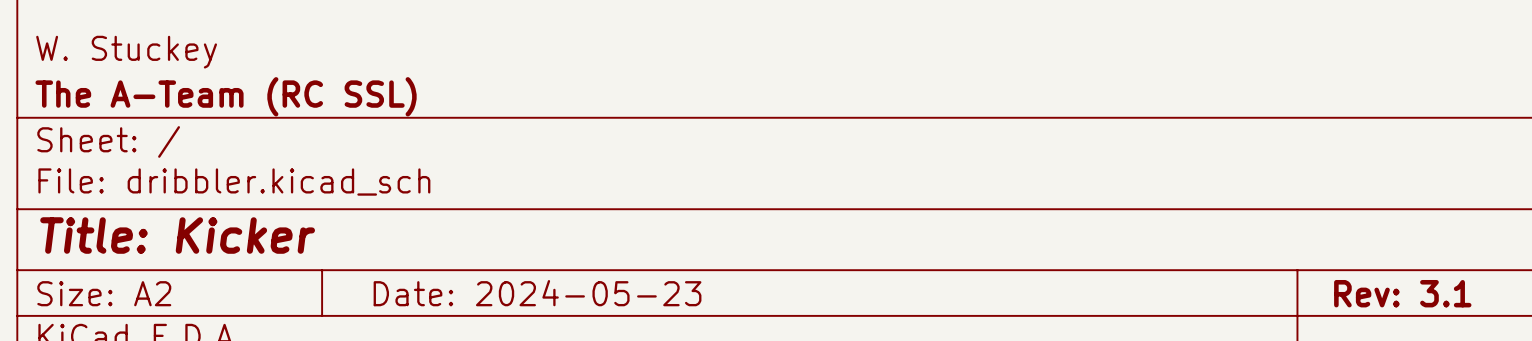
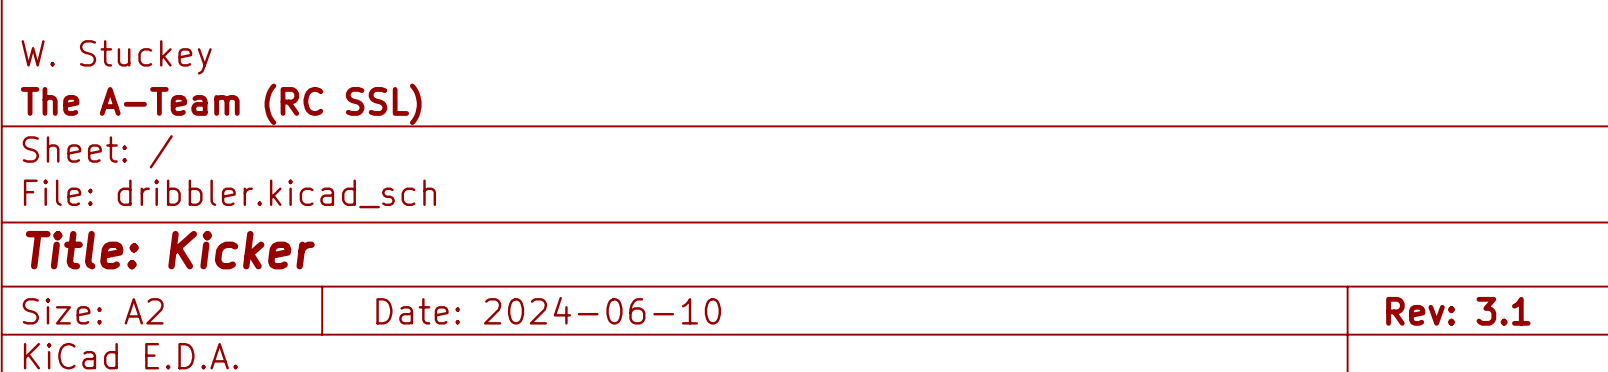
title block: Date: 2024-05-23 (537, 293) -> Date: 2024-06-10 (548, 310)

